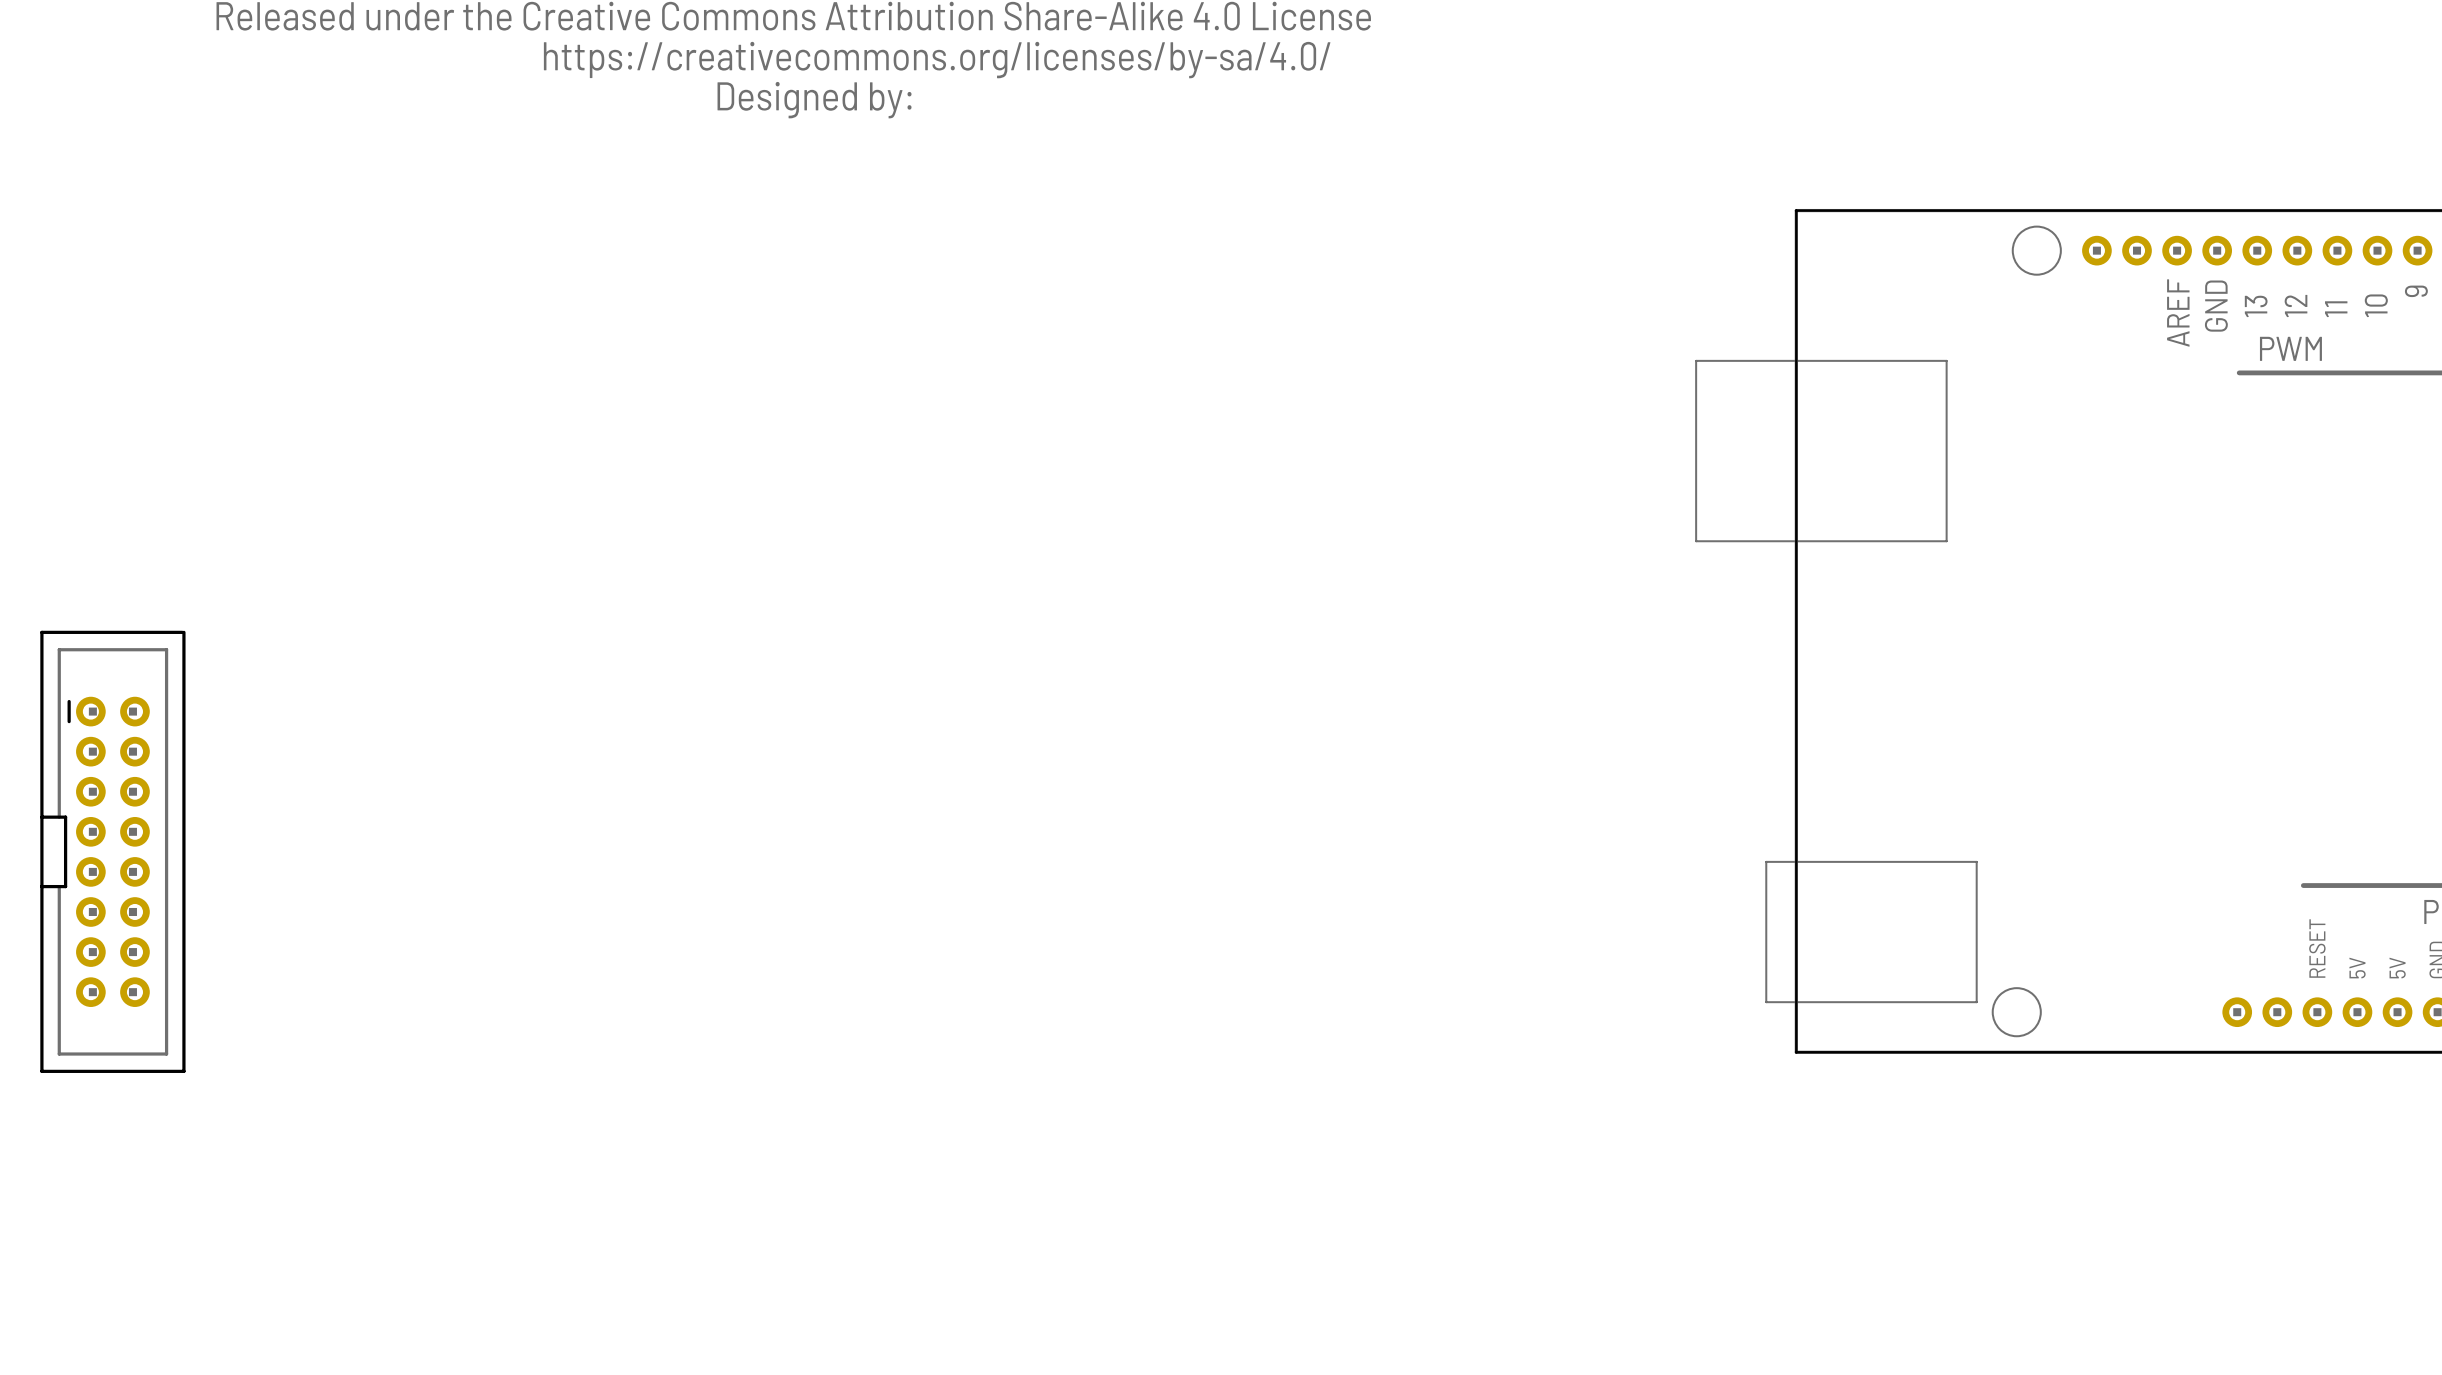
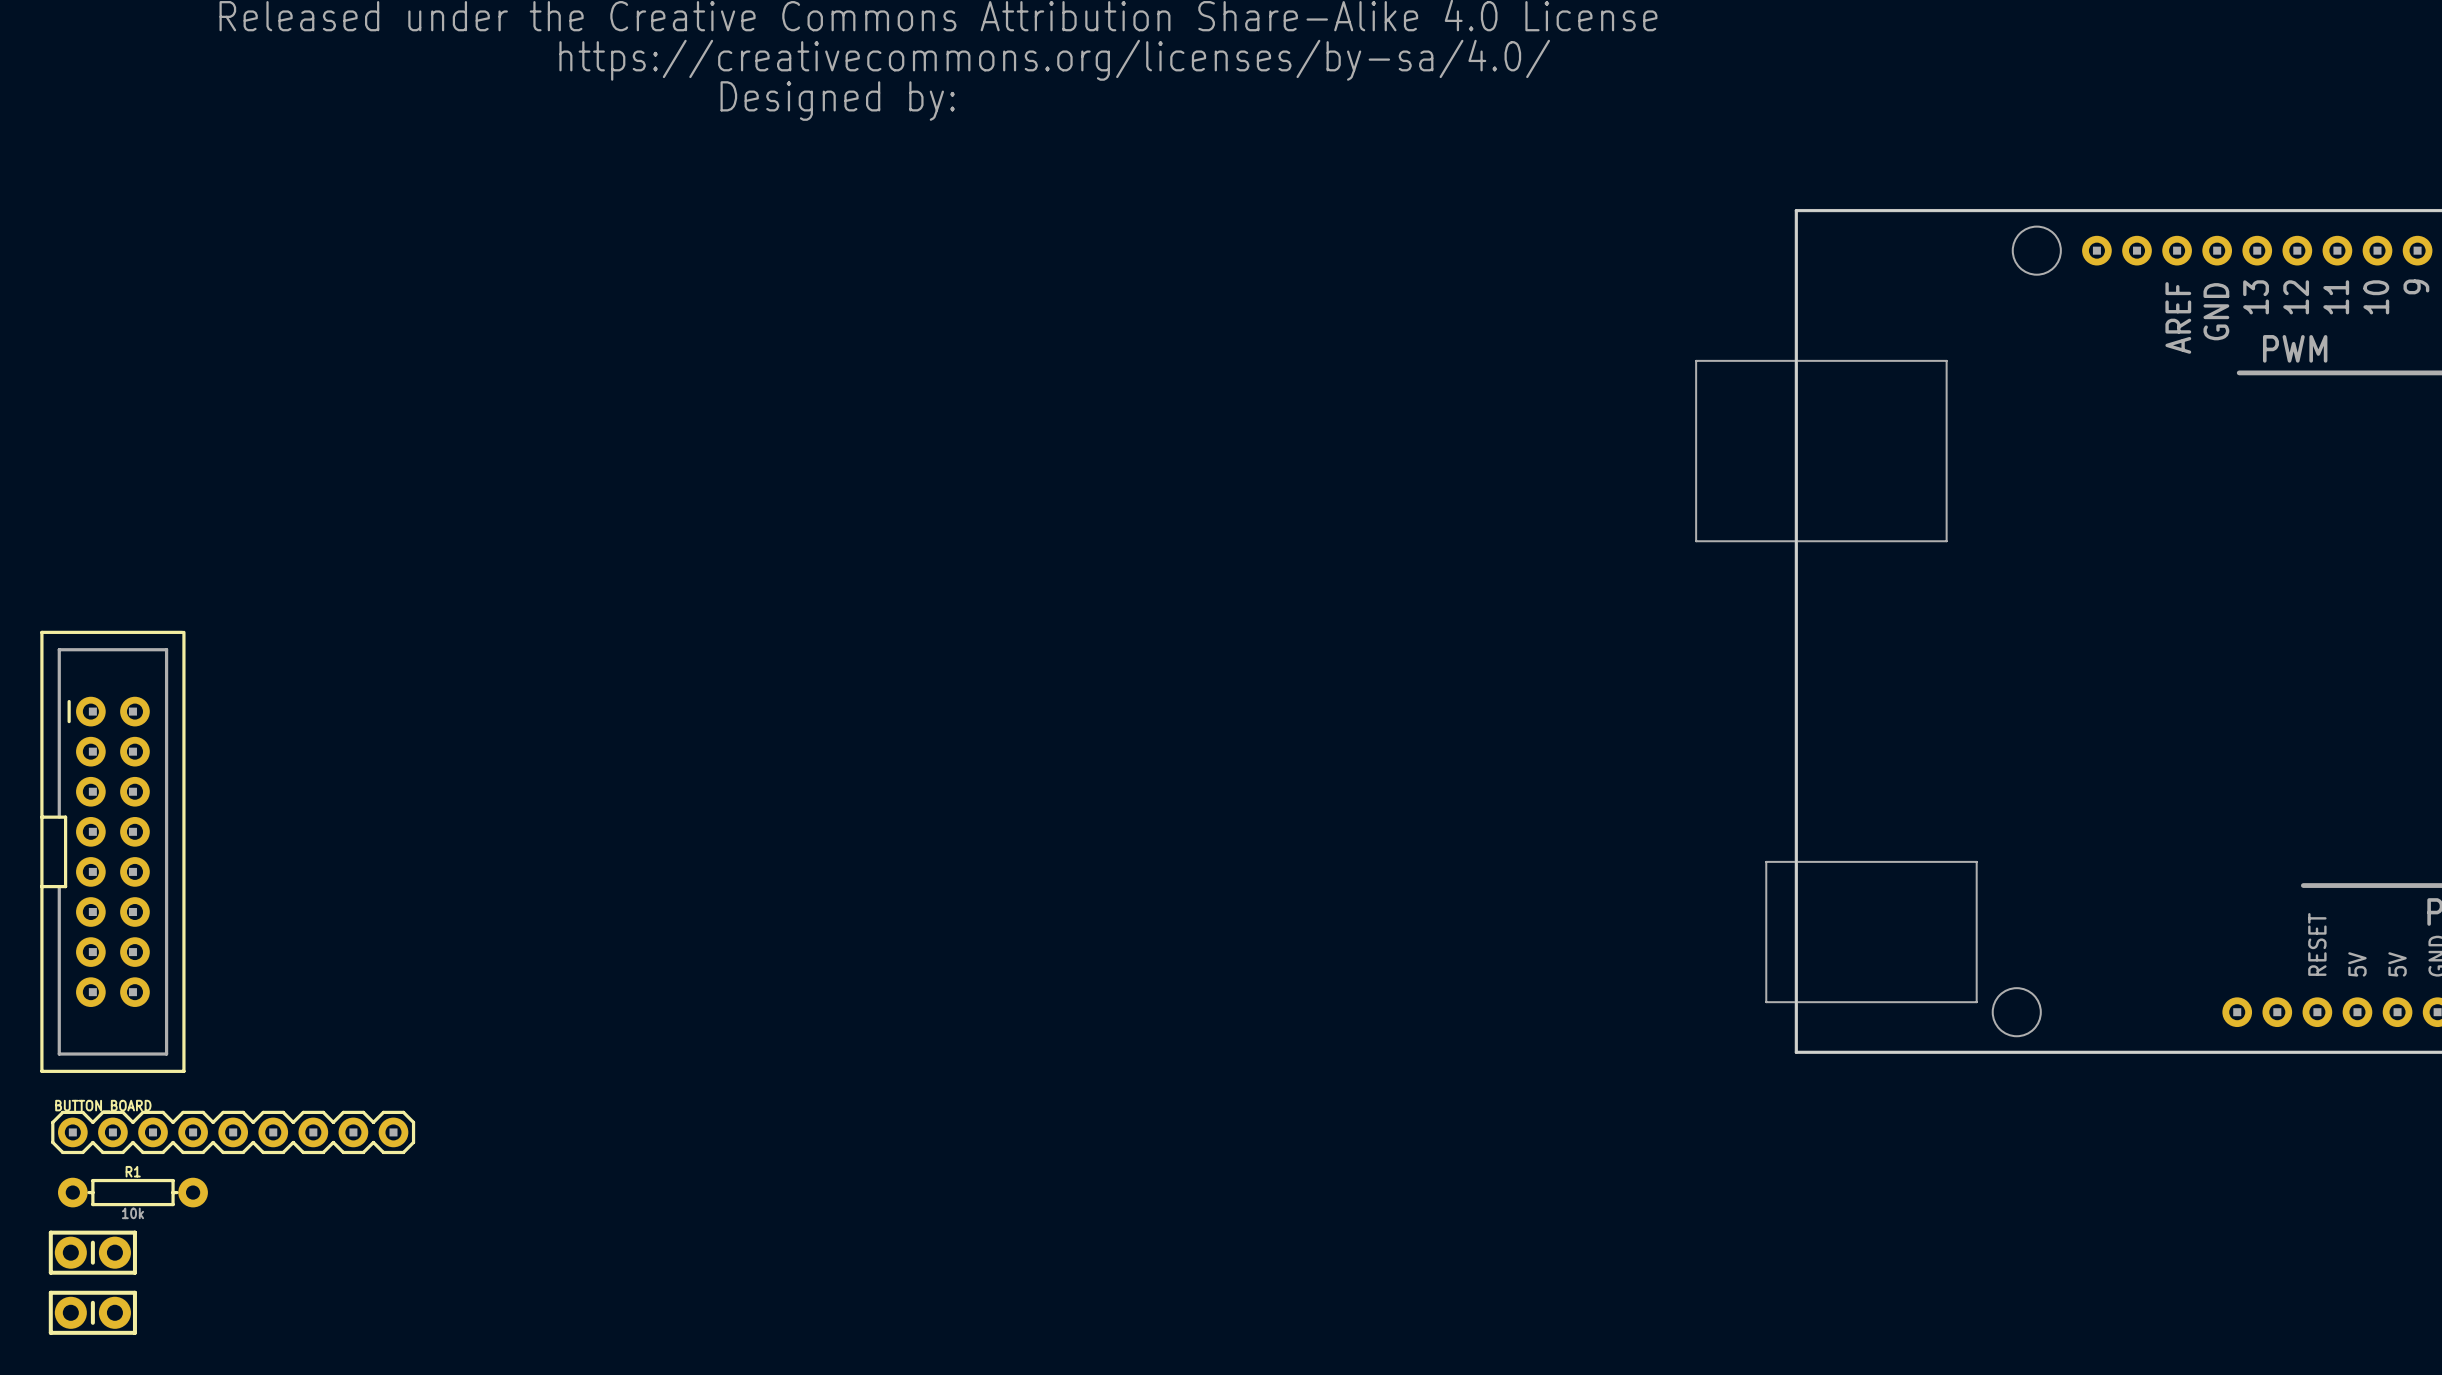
BUTTON_BOARD: none -> (233, 1132)
R1: none -> 10k (132, 1192)
part: none -> (92, 1252)
part: none -> (92, 1312)

